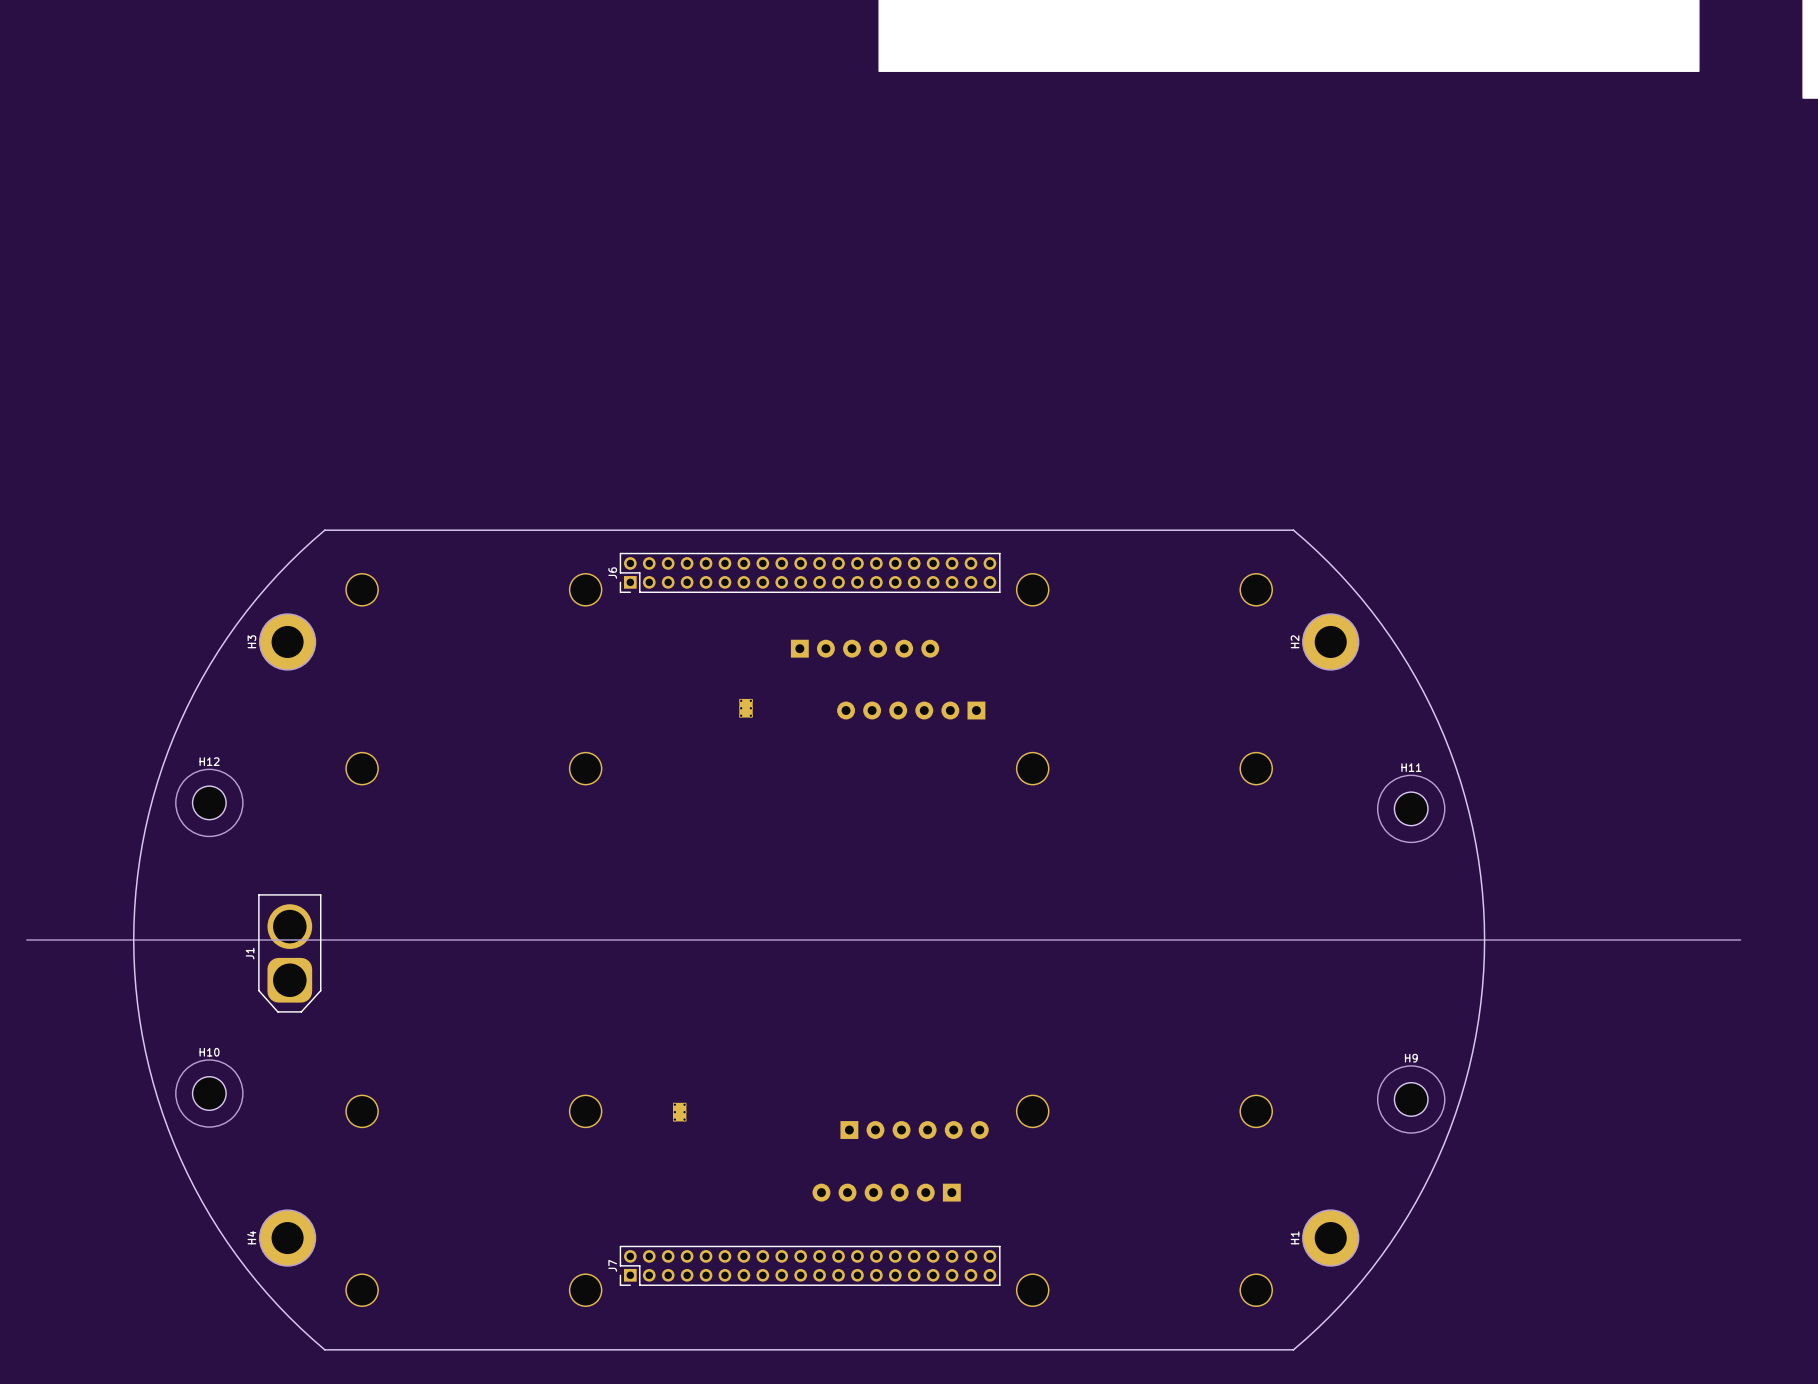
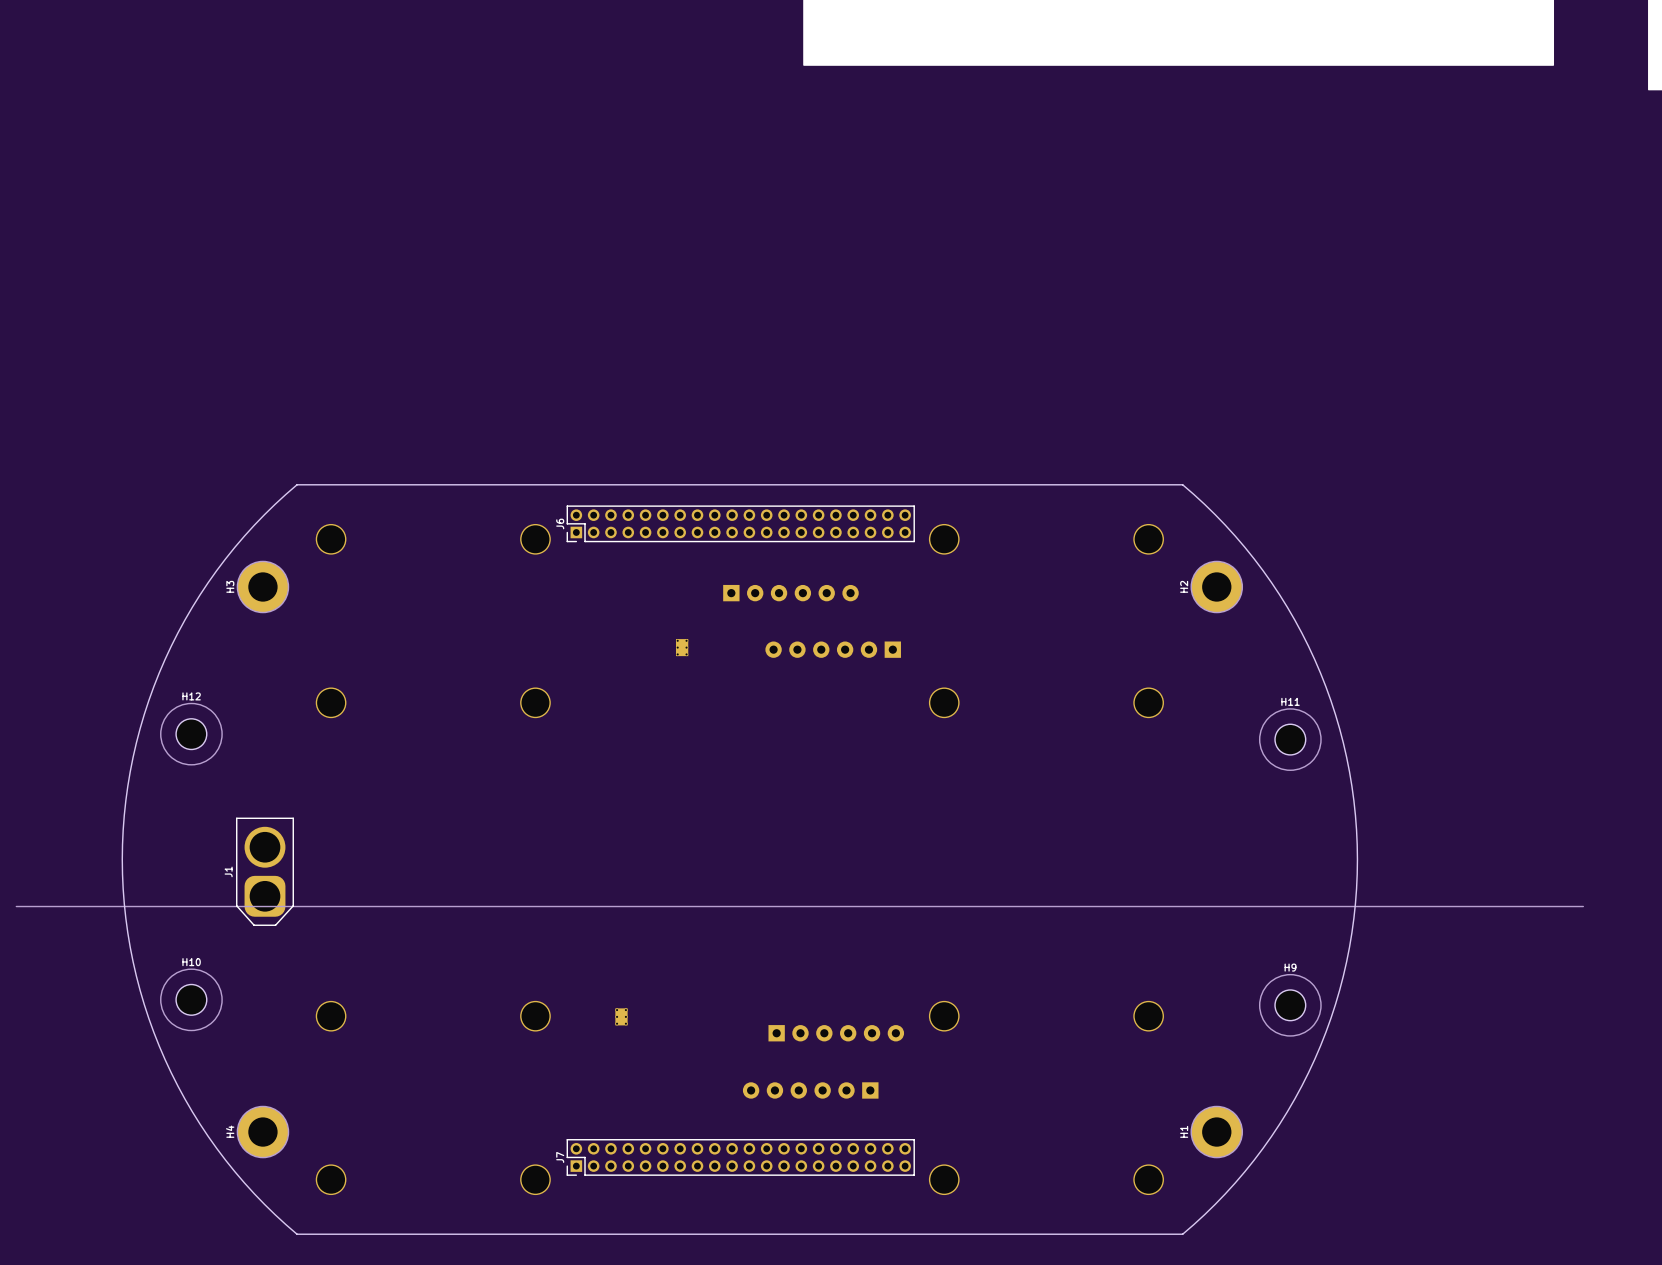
line: (26, 940) (1740, 940) -> (16, 906) (1583, 906)

